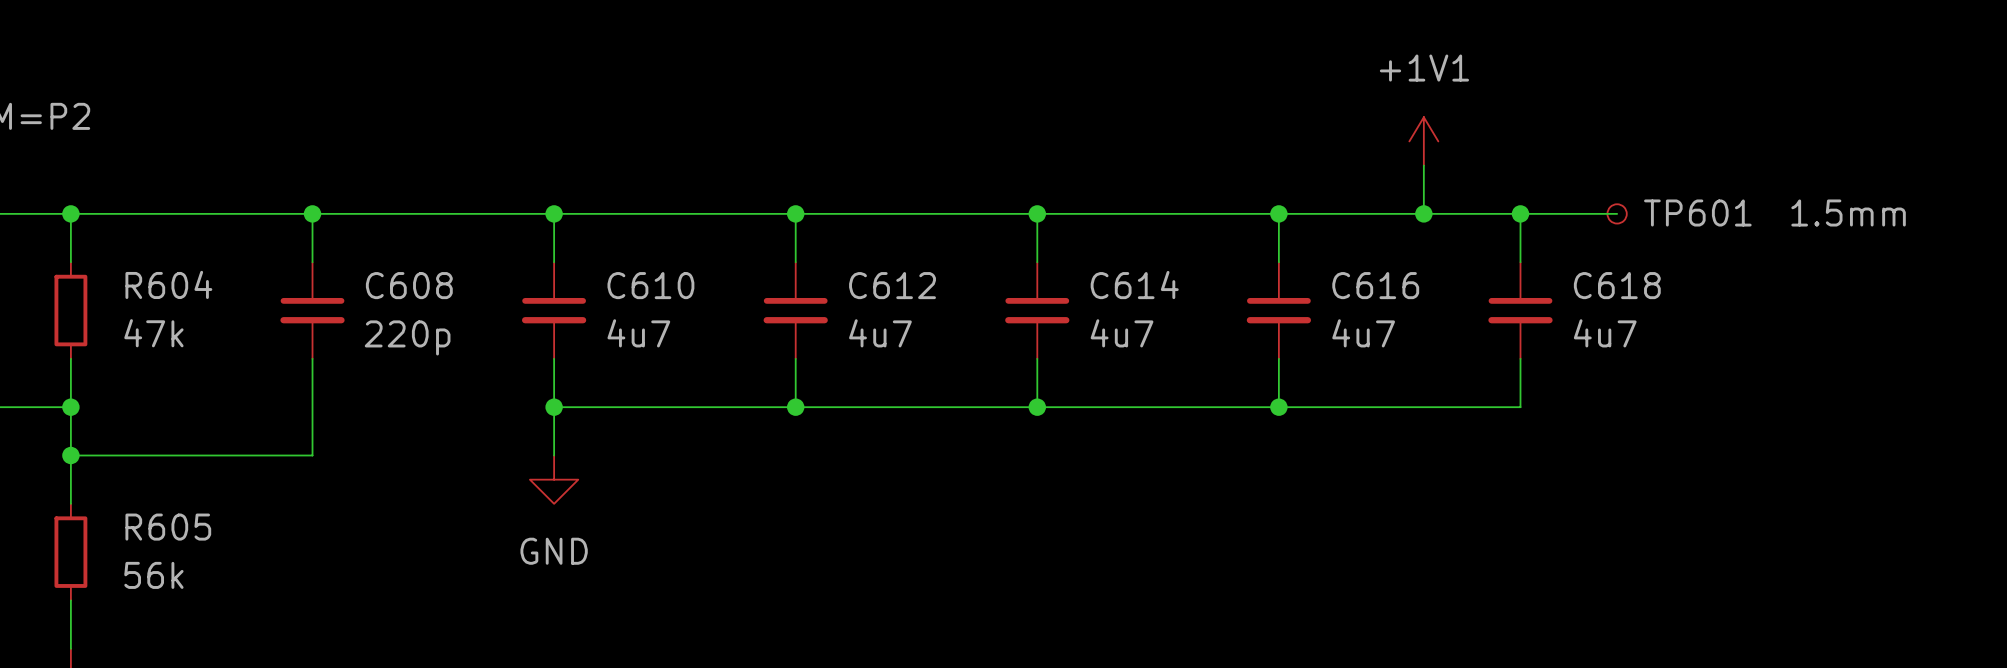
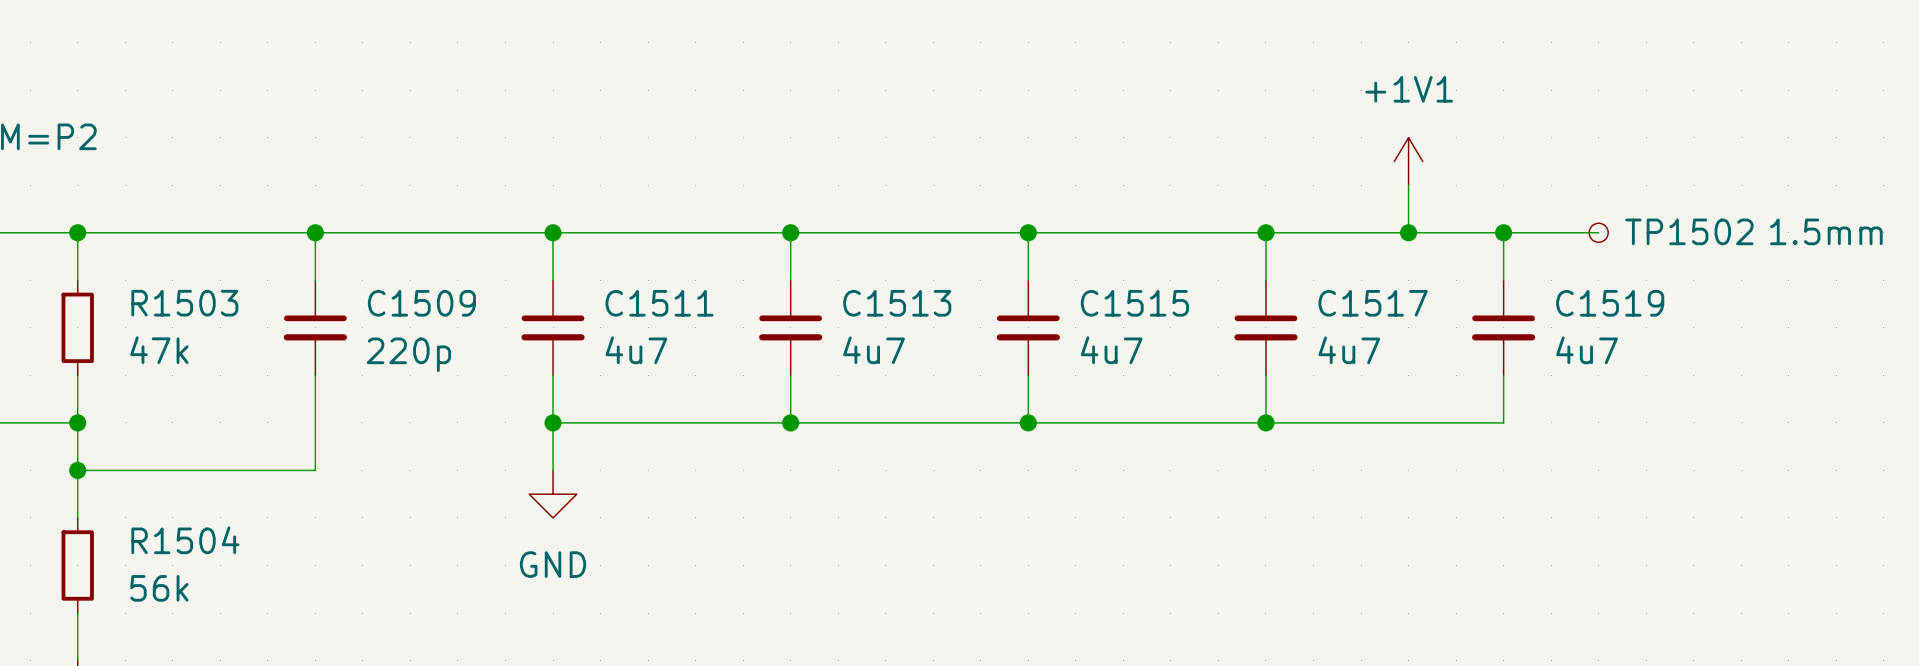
TP601 name: TP601 (1697, 213) -> TP1502 (1689, 231)
R604 name: R604 (168, 284) -> R1503 (184, 303)
C608 name: C608 (409, 285) -> C1509 (421, 303)
C610 name: C610 (650, 285) -> C1511 (659, 303)
C612 name: C612 (892, 285) -> C1513 (897, 303)
C614 name: C614 (1134, 285) -> C1515 (1134, 303)
C616 name: C616 (1375, 285) -> C1517 (1373, 303)
C618 name: C618 (1617, 285) -> C1519 (1610, 303)
R605 name: R605 (168, 527) -> R1504 (185, 540)

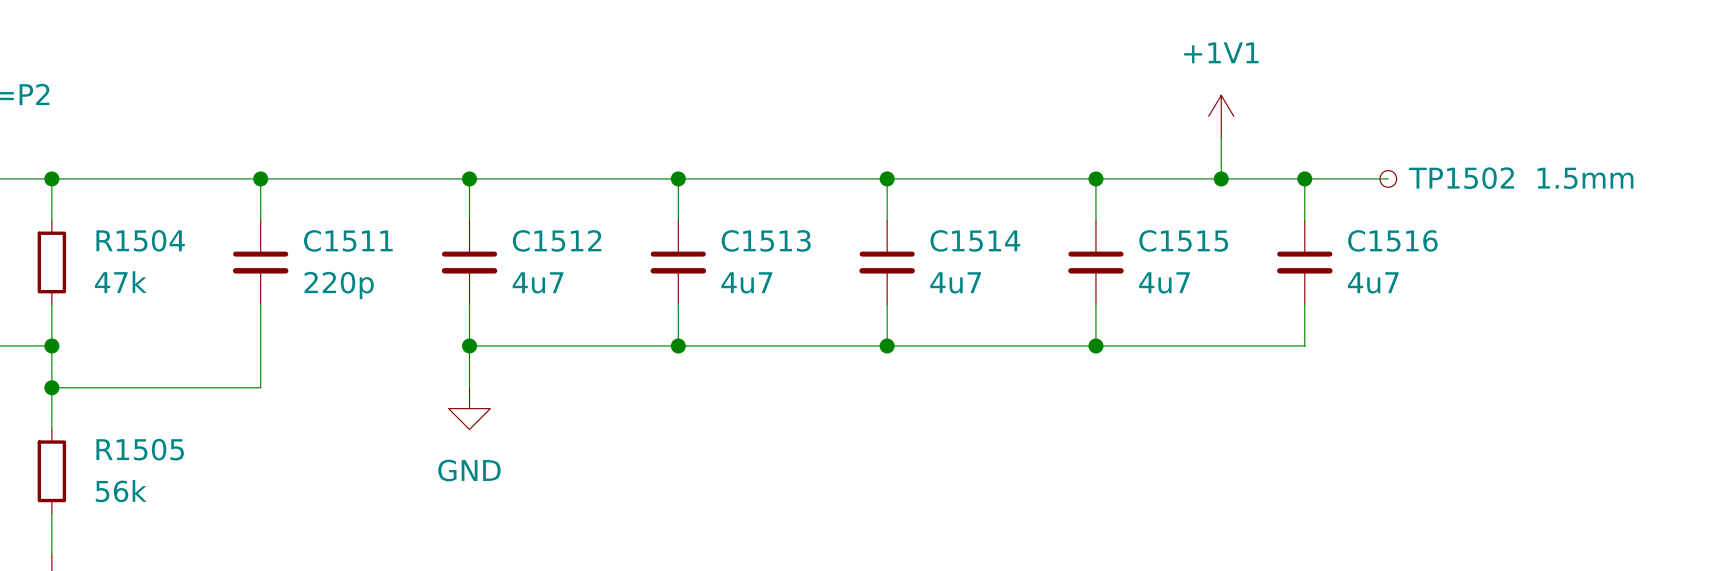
R1503 name: R1503 (184, 303) -> R1504 (140, 240)
C1509 name: C1509 (421, 303) -> C1511 (348, 240)
C1511 name: C1511 (659, 303) -> C1512 (557, 240)
C1515 name: C1515 (1134, 303) -> C1514 (975, 240)
C1517 name: C1517 (1373, 303) -> C1515 (1183, 240)
C1519 name: C1519 (1610, 303) -> C1516 (1392, 240)
R1504 name: R1504 (185, 540) -> R1505 (140, 449)

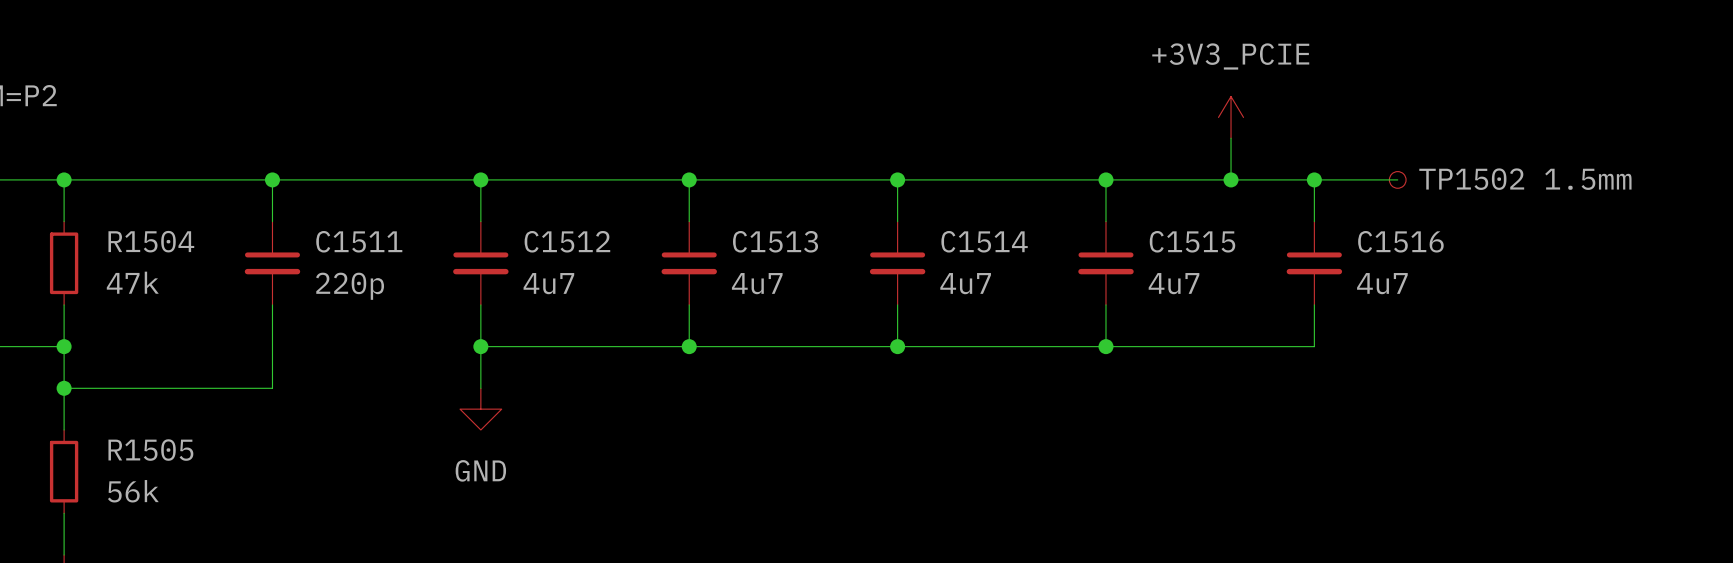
power symbol: +1V1 (1221, 116) -> +3V3_PCIE (1231, 117)

